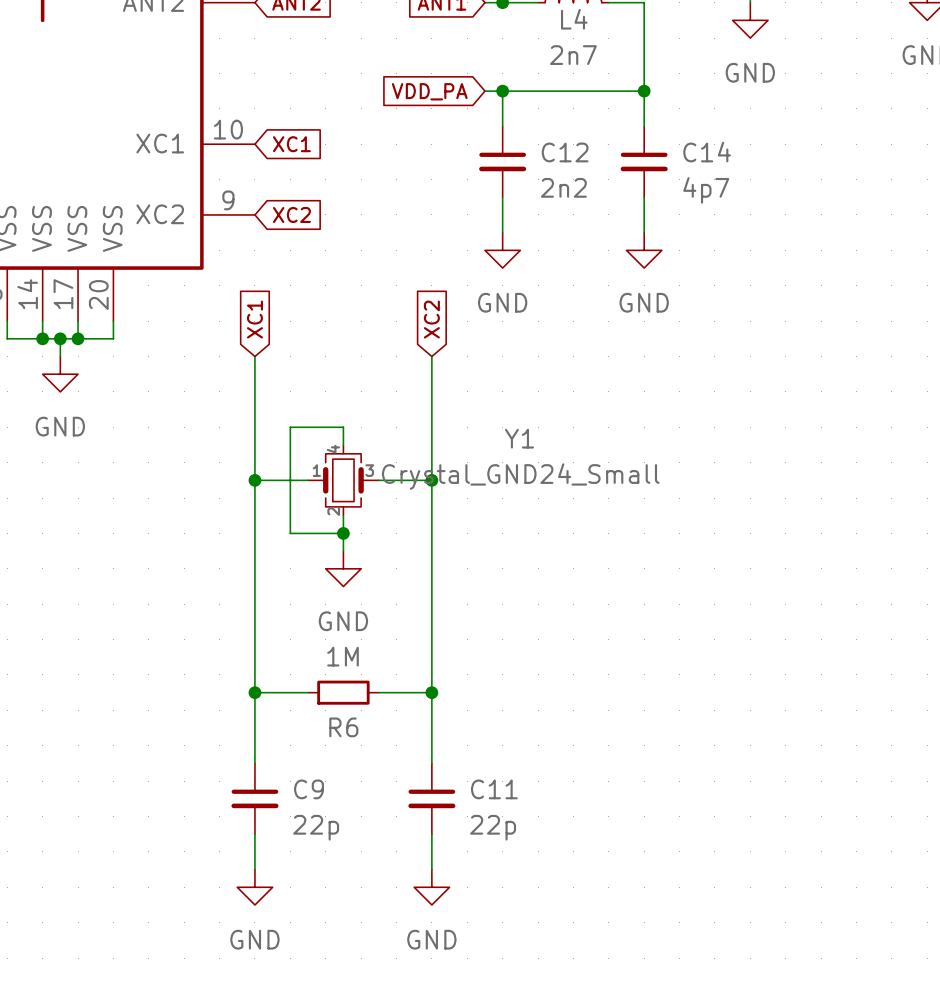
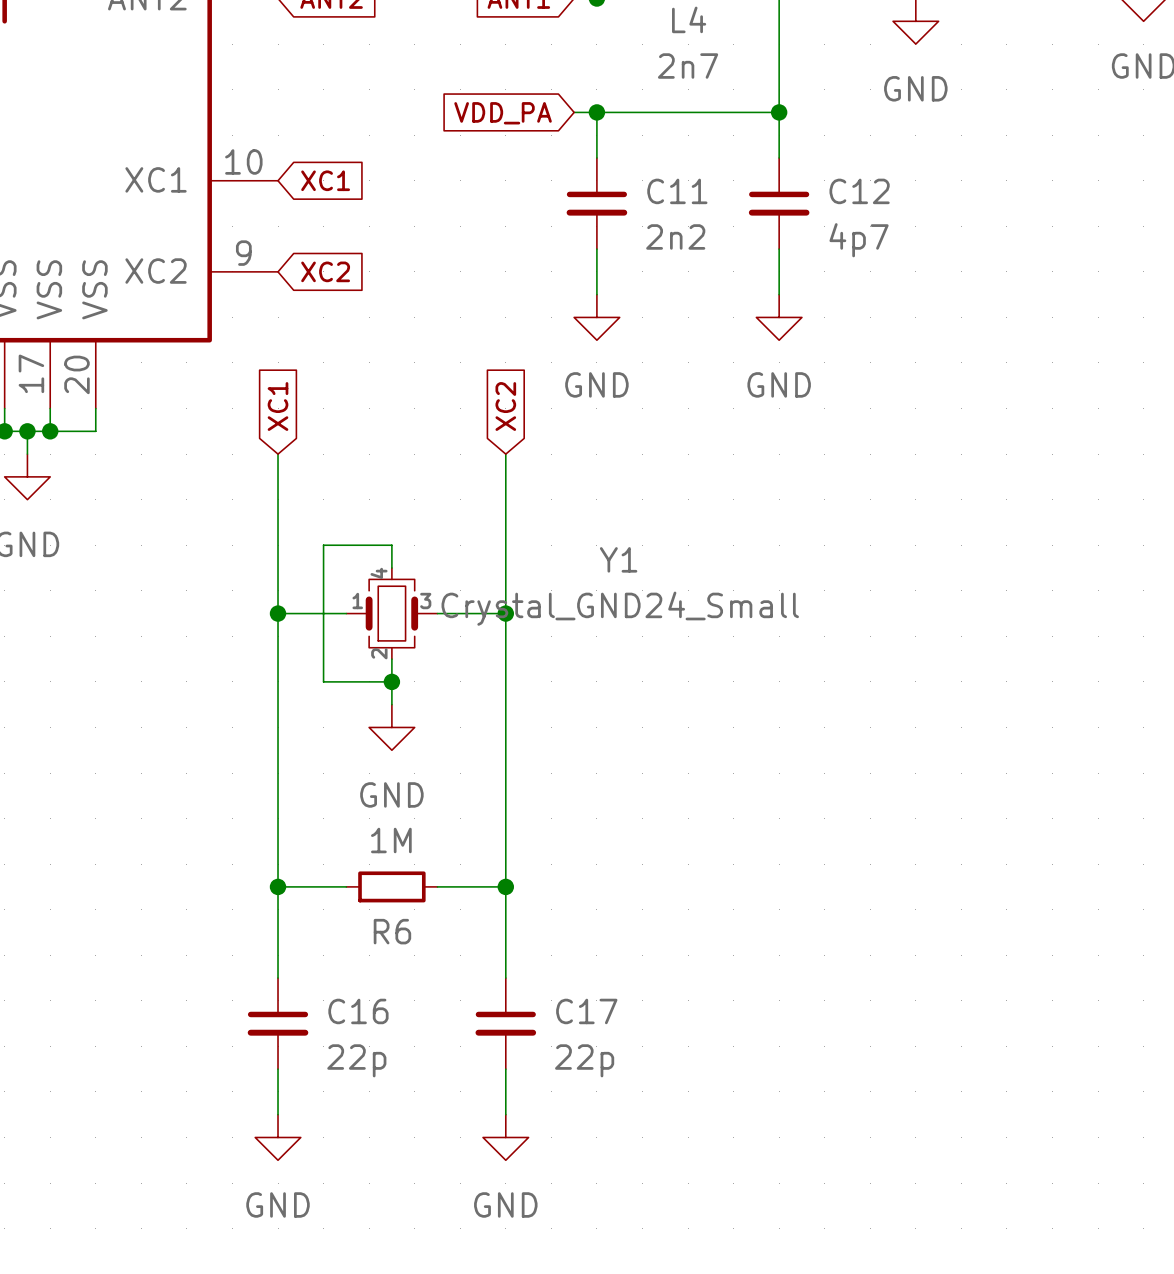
C12 name: C12 (565, 152) -> C11 (677, 191)
C14 name: C14 (707, 152) -> C12 (859, 191)
C9 name: C9 (309, 789) -> C16 (358, 1011)
C11 name: C11 (494, 789) -> C17 (586, 1011)

